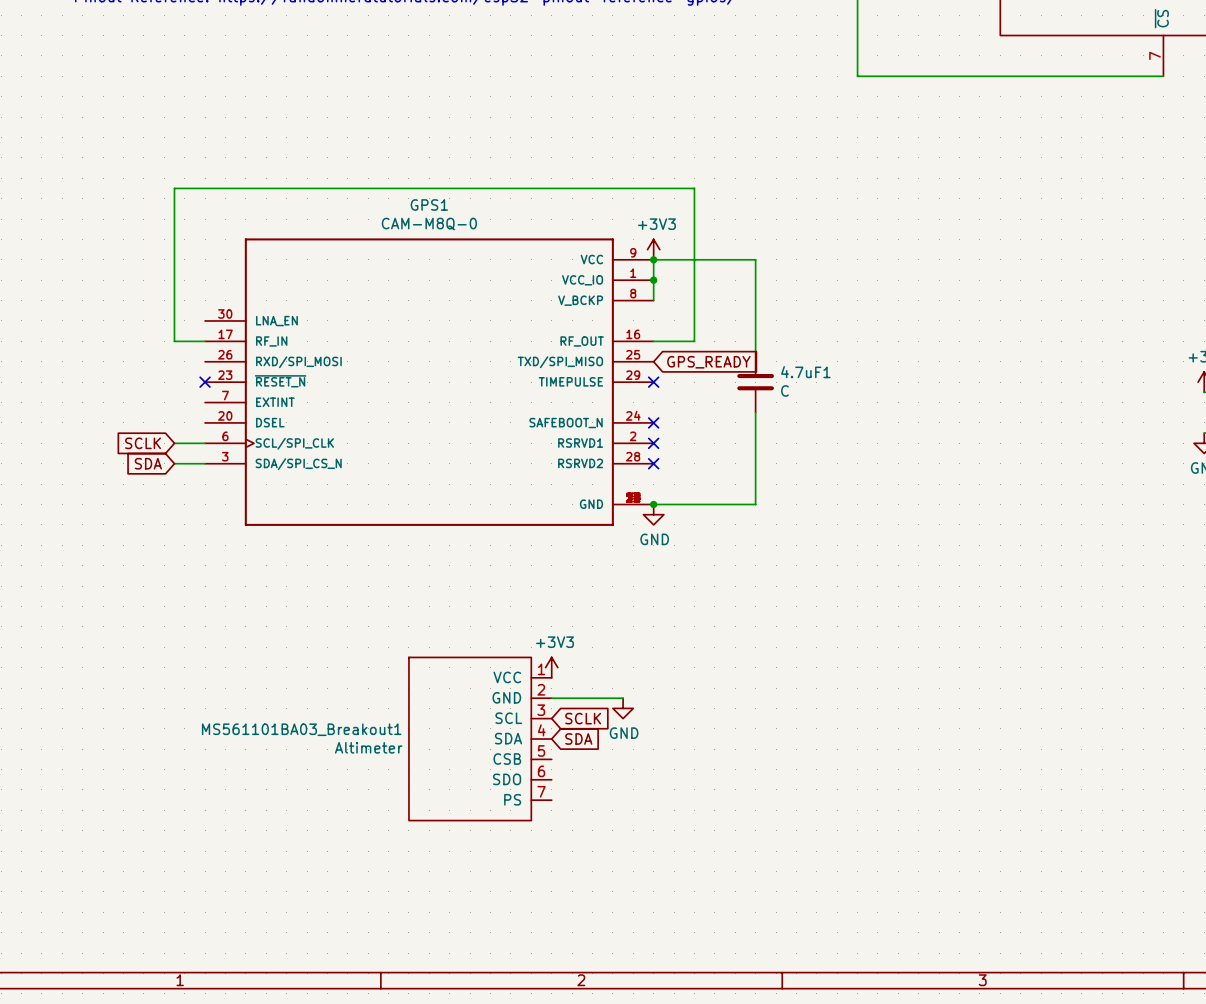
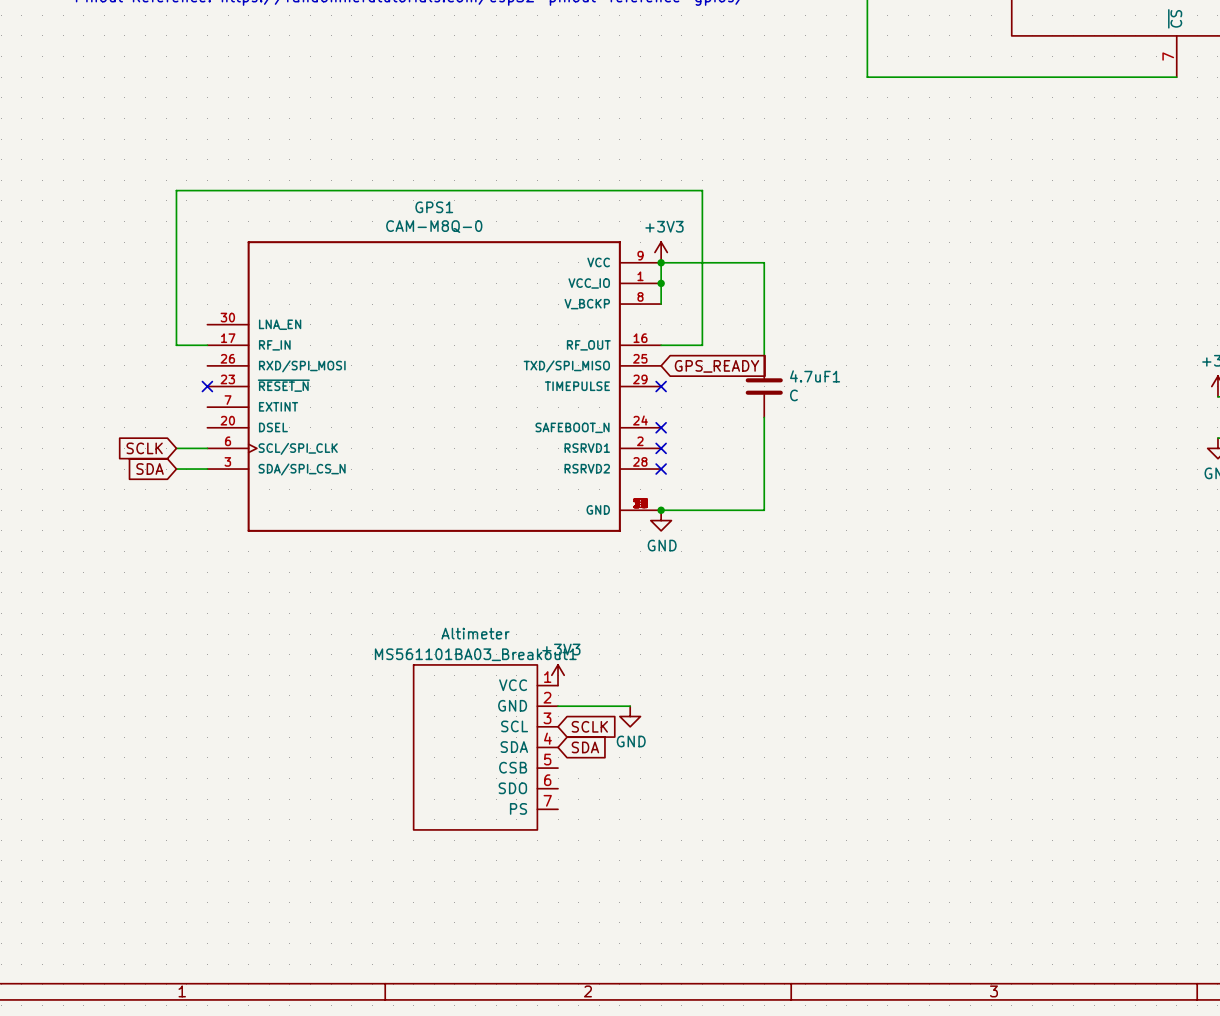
MS561101BA03_Breakout1 name position: MS561101BA03_Breakout1 (301, 729) -> MS561101BA03_Breakout1 (475, 654)
MS561101BA03_Breakout1 value position: Altimeter (368, 747) -> Altimeter (475, 633)

